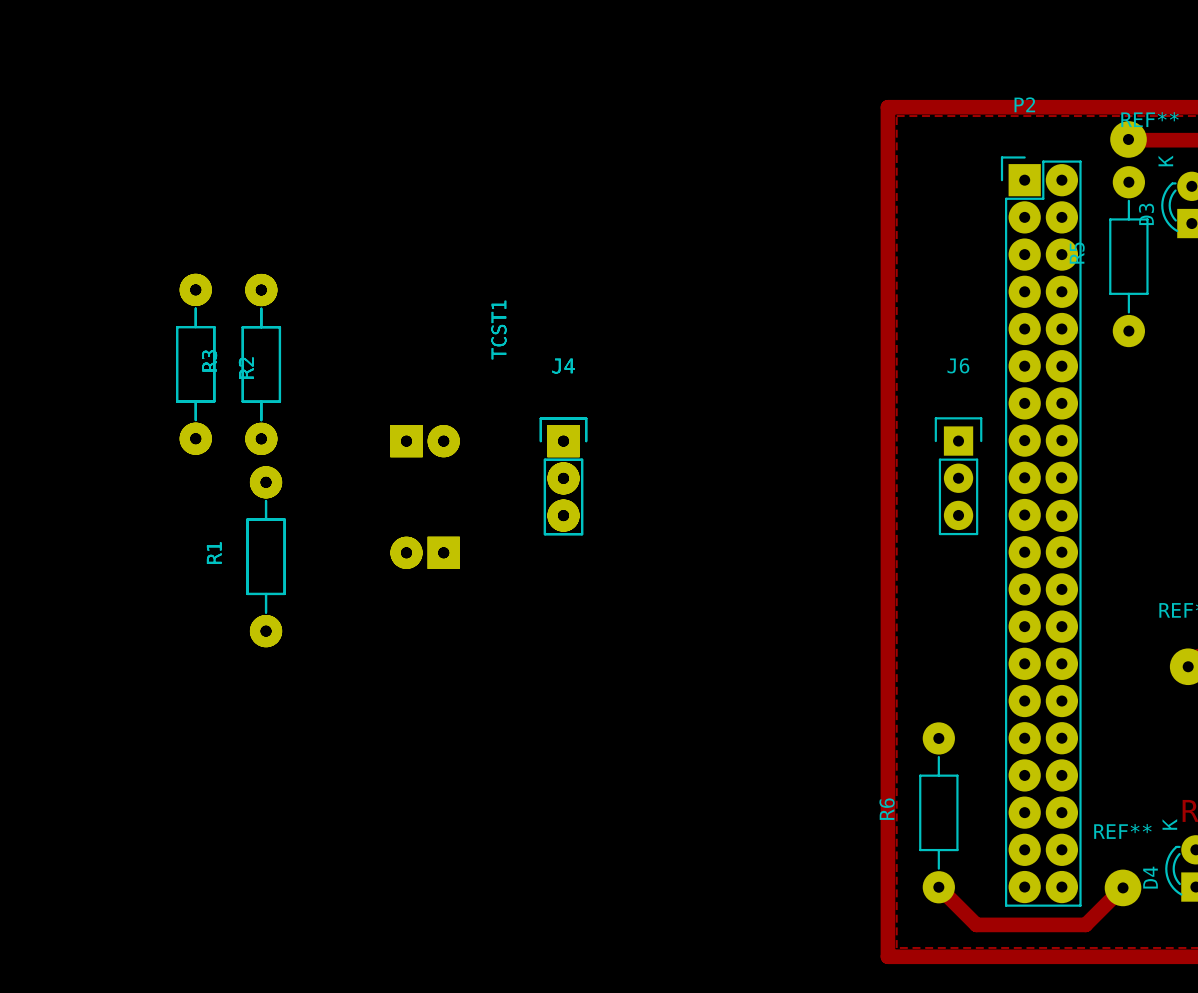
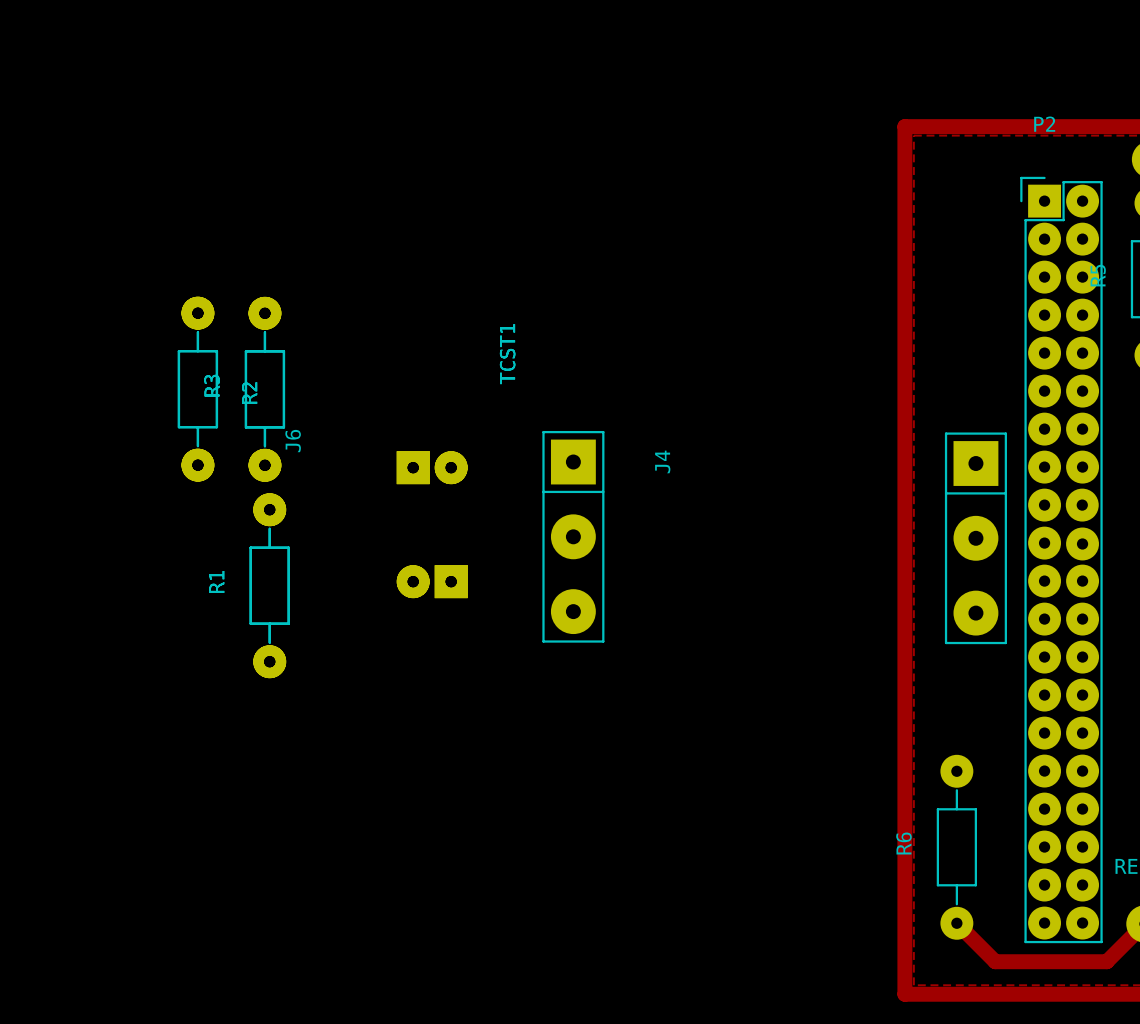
J6 name position: J6 (958, 365) -> J6 (293, 441)
J6 footprint: [934, 417, 983, 536] -> [944, 432, 1007, 645]
J4: (563, 476) -> none
J4: none -> (573, 536)

